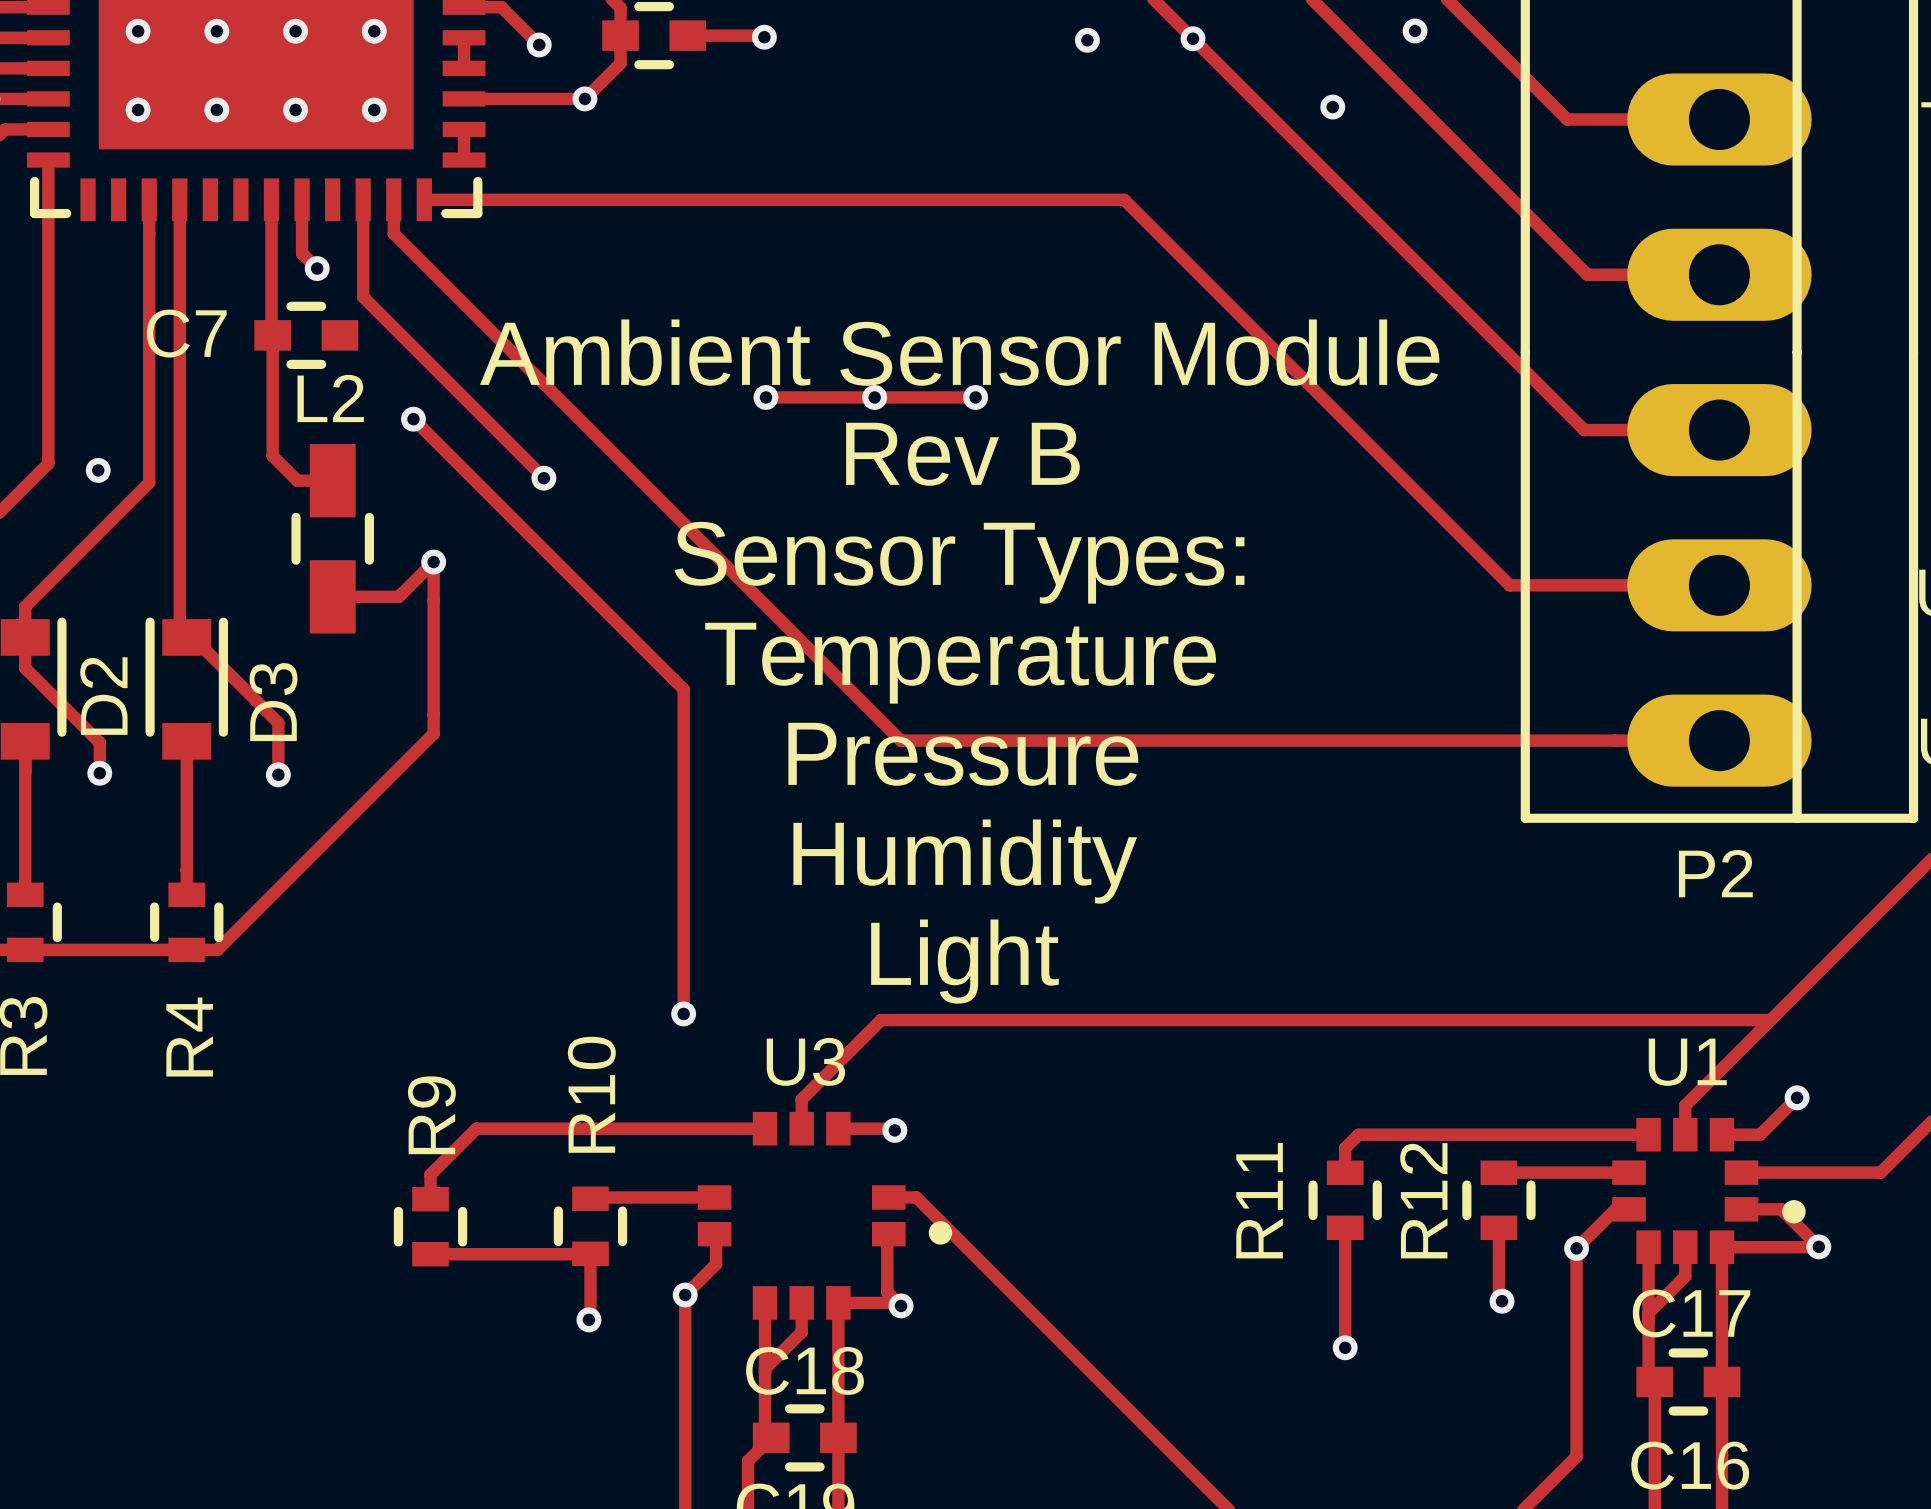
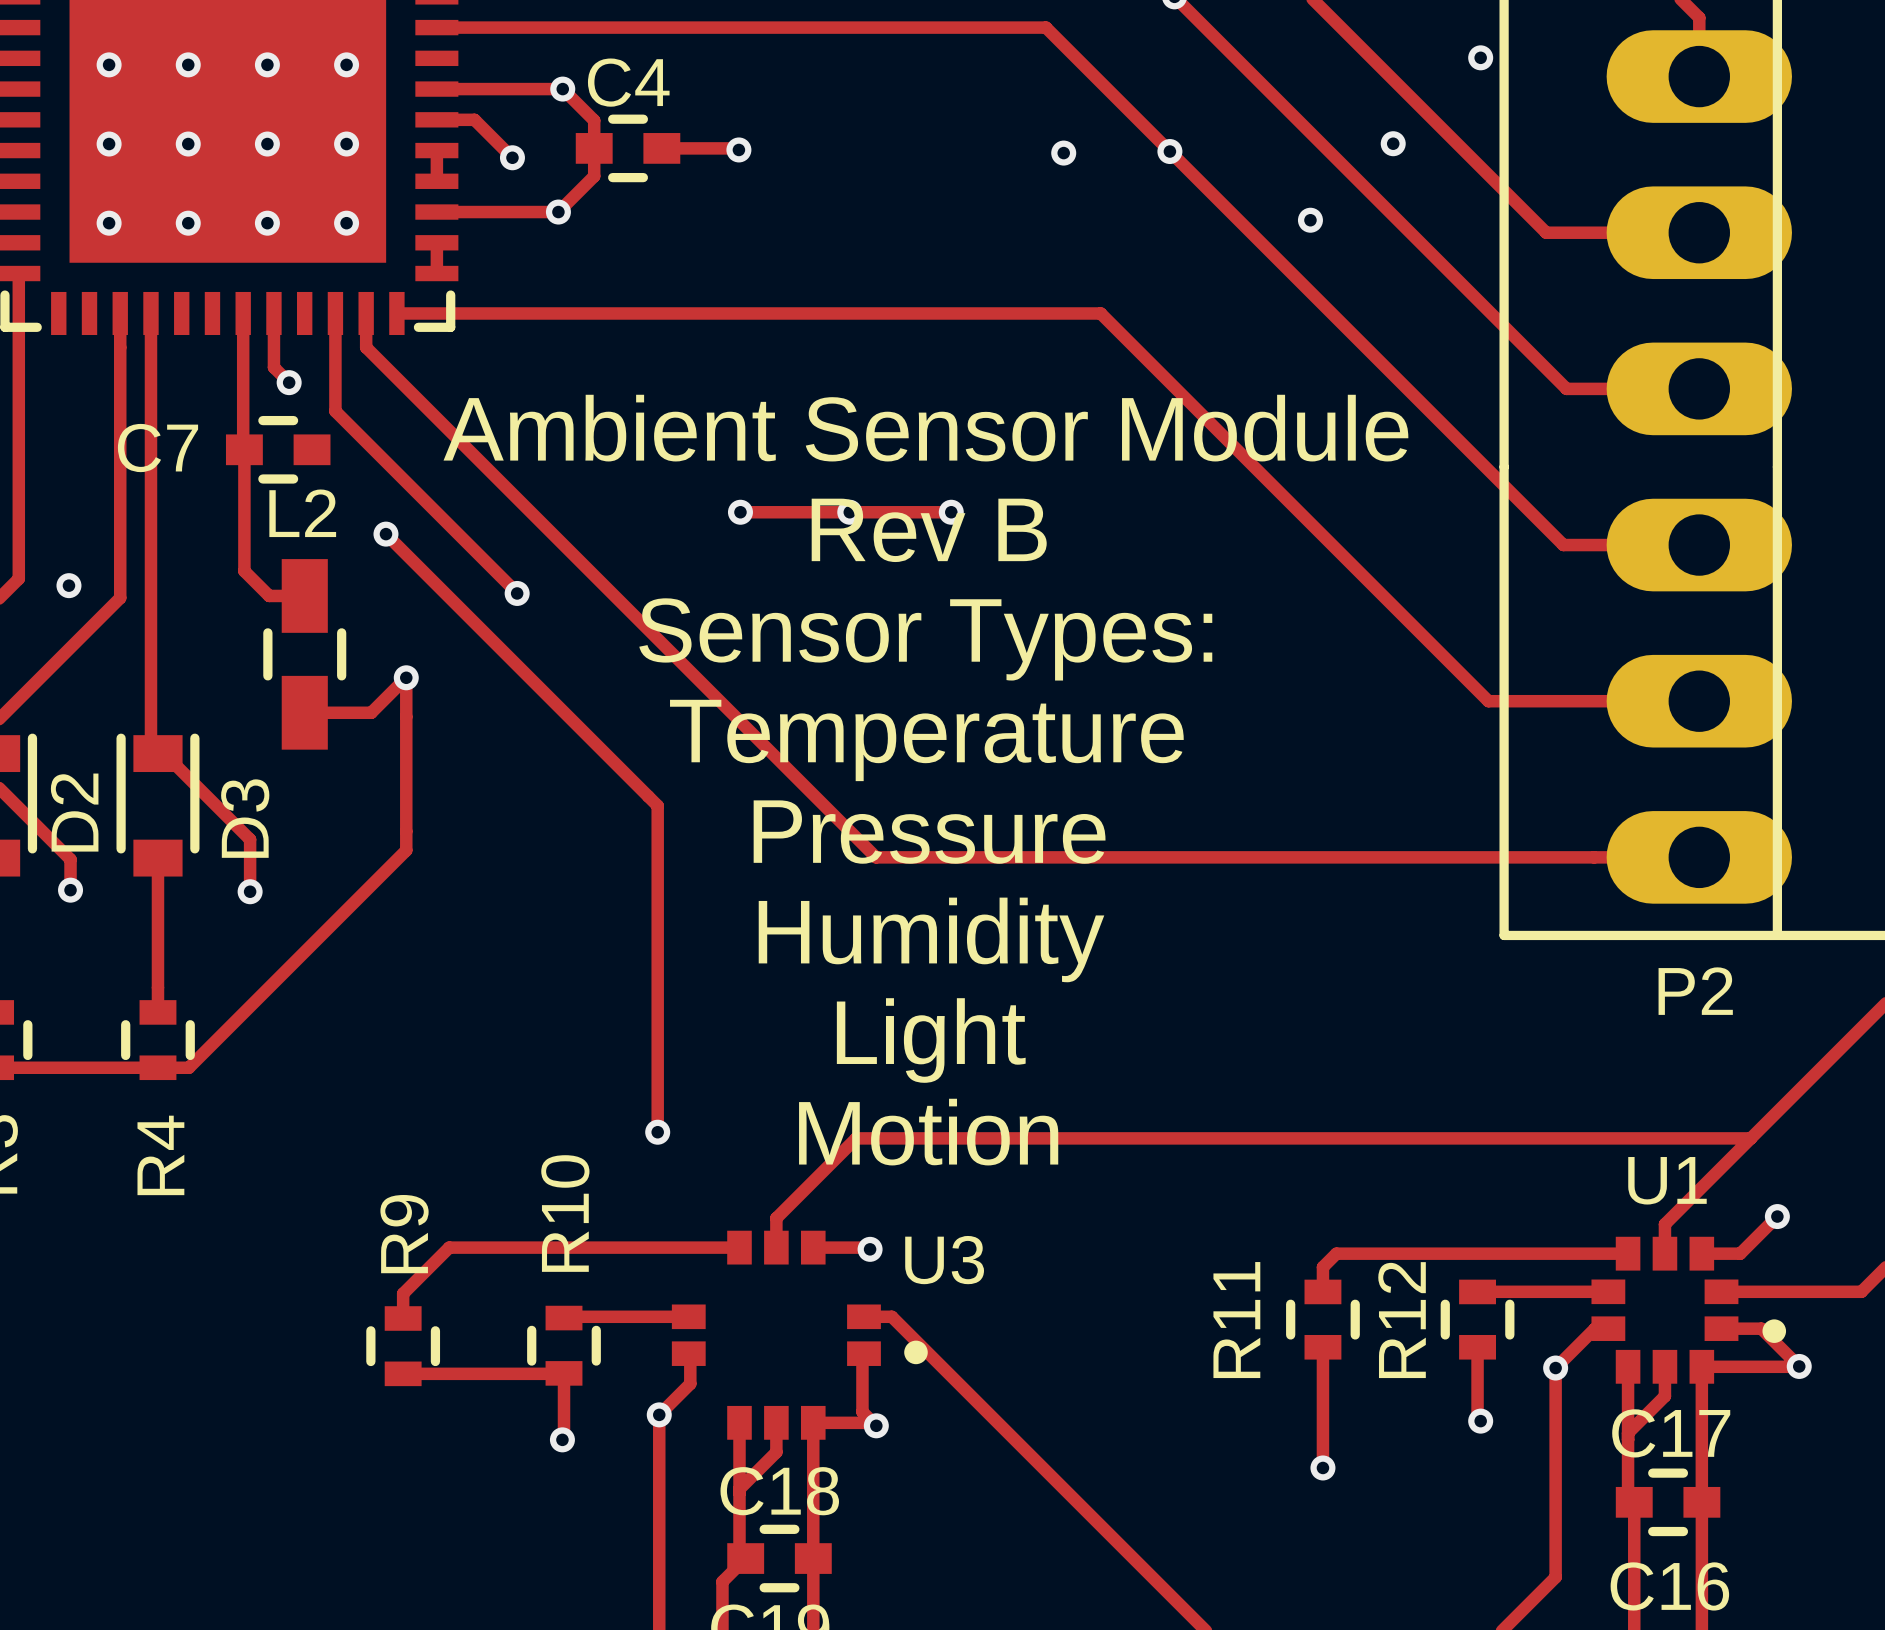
text position: Ambient Sensor Module (959, 352) -> Ambient Sensor Module (925, 428)
text position: Rev B (962, 454) -> Rev B (929, 530)
text position: Sensor Types: (959, 562) -> Sensor Types: (925, 639)
text position: Temperature (960, 663) -> Temperature (926, 740)
text position: Pressure (963, 754) -> Pressure (929, 832)
text position: Humidity (965, 861) -> Humidity (931, 939)
text position: Light (964, 961) -> Light (931, 1040)
text: none -> Motion (928, 1132)
U3 name position: U3 (805, 1061) -> U3 (944, 1260)

